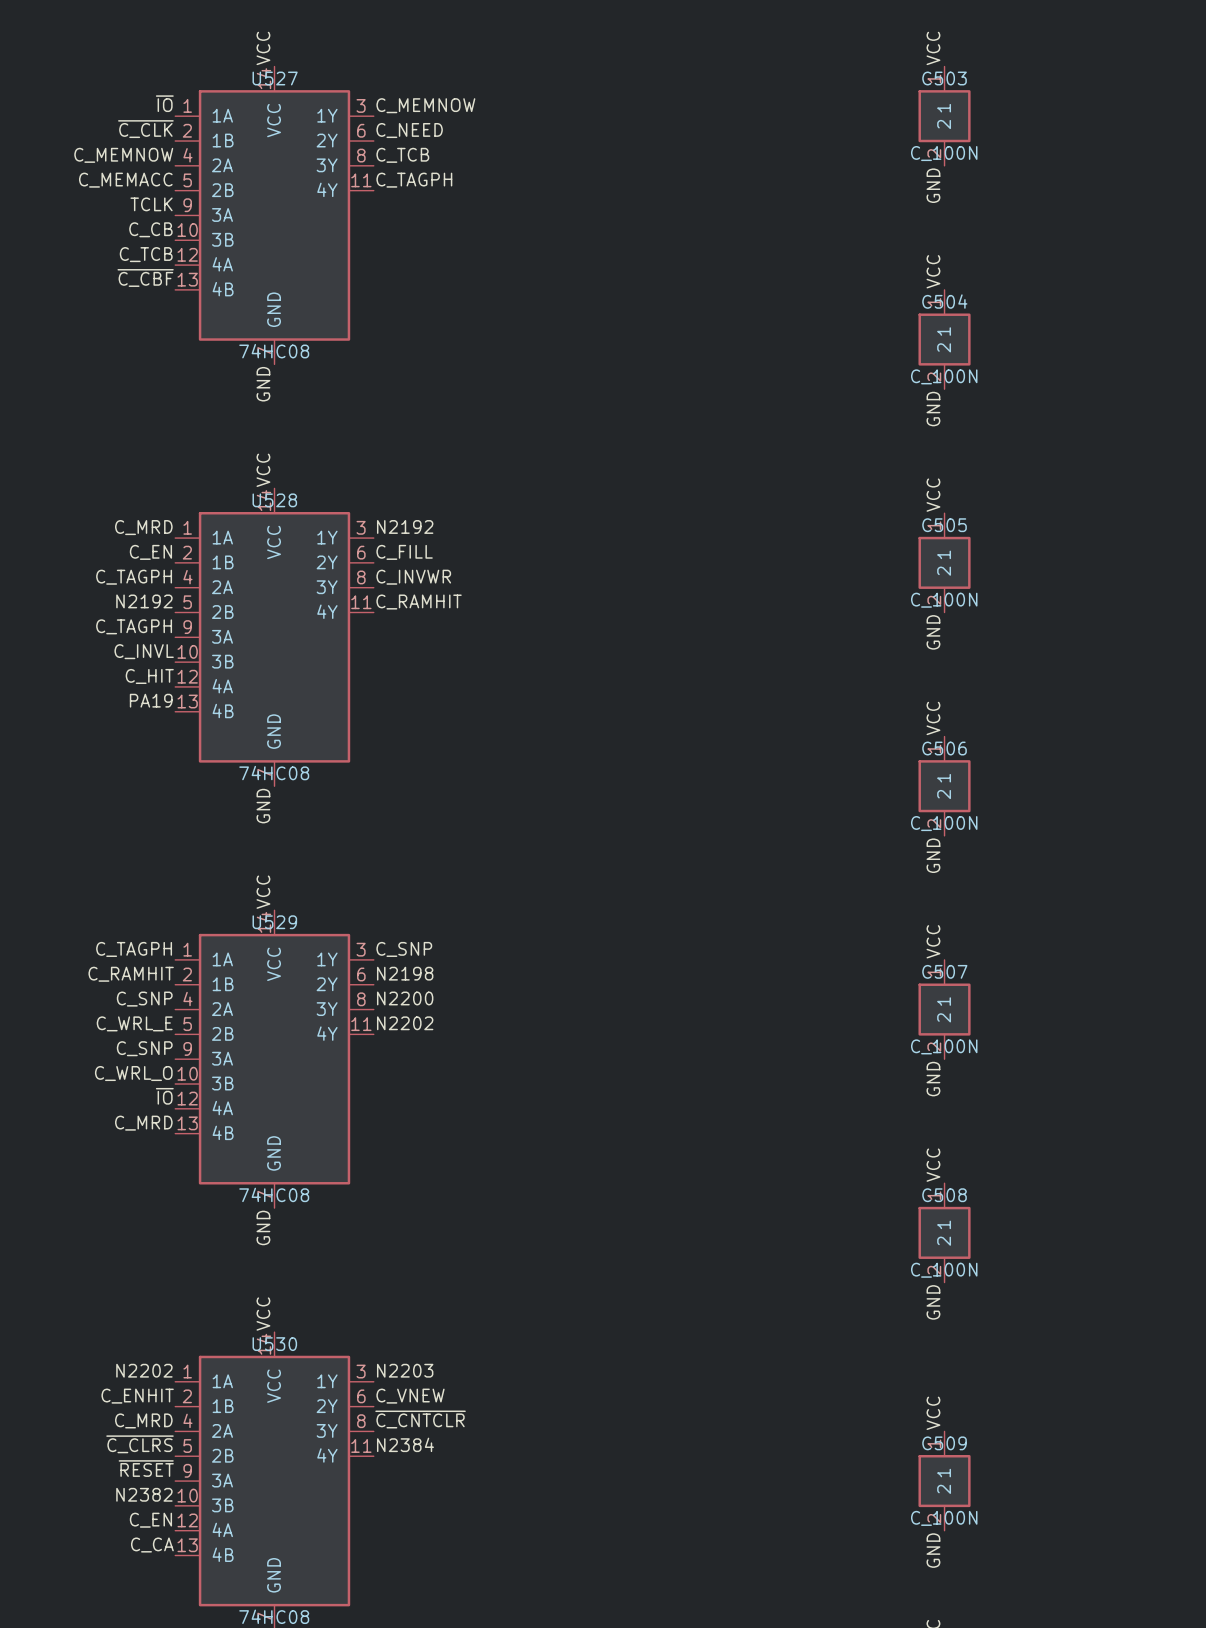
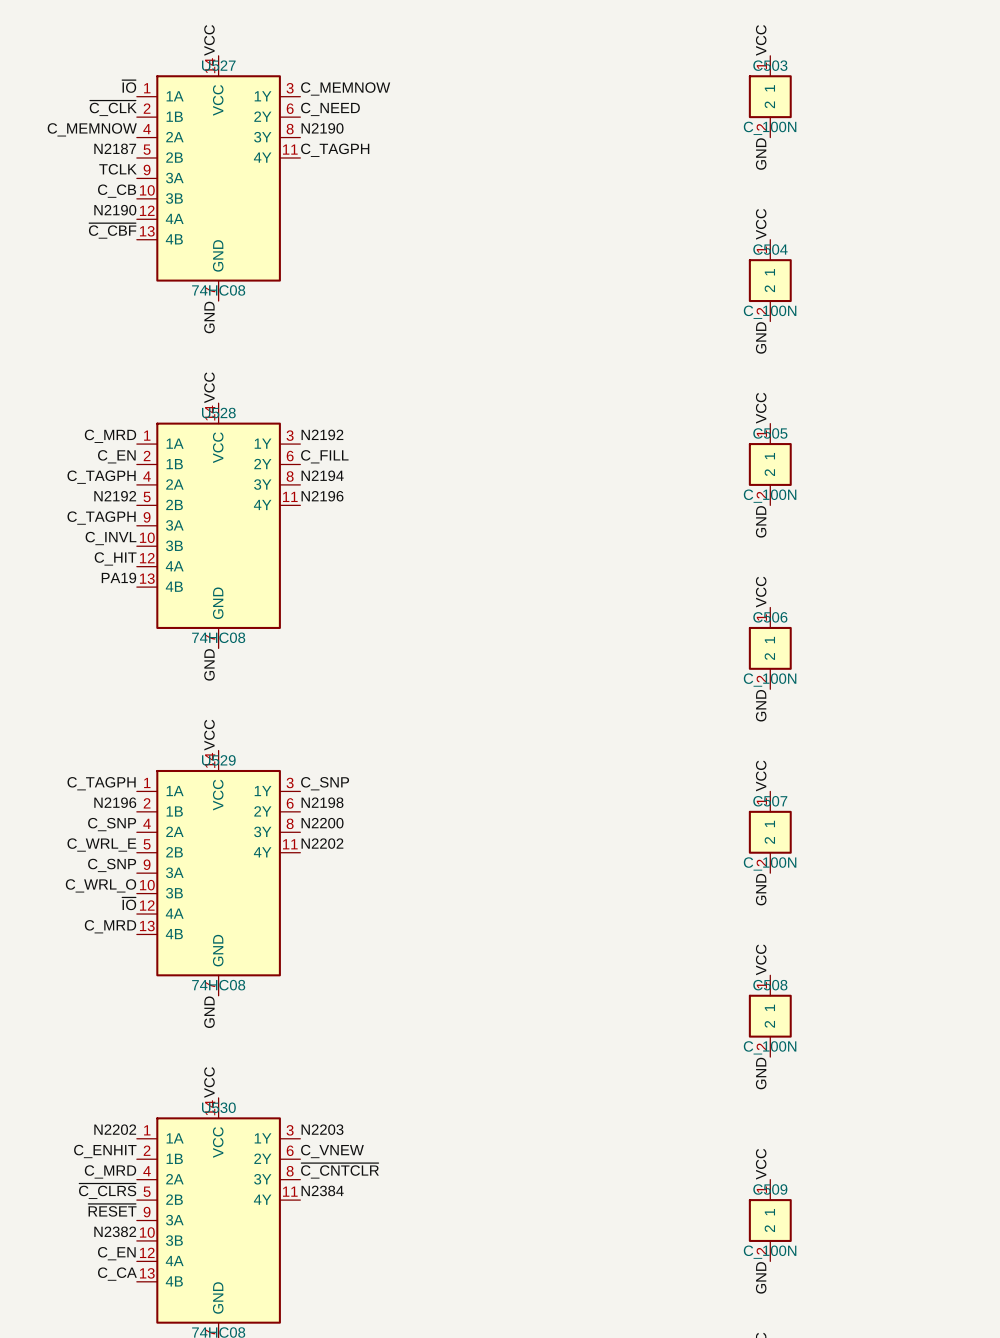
label: C_TCB (402, 155) -> N2190 (322, 128)
label: C_MEMACC (125, 180) -> N2187 (115, 148)
label: C_TCB (146, 254) -> N2190 (115, 210)
label: C_INVWR (413, 577) -> N2194 (322, 475)
label: C_RAMHIT (419, 602) -> N2196 (322, 496)
label: C_RAMHIT (131, 974) -> N2196 (115, 802)

